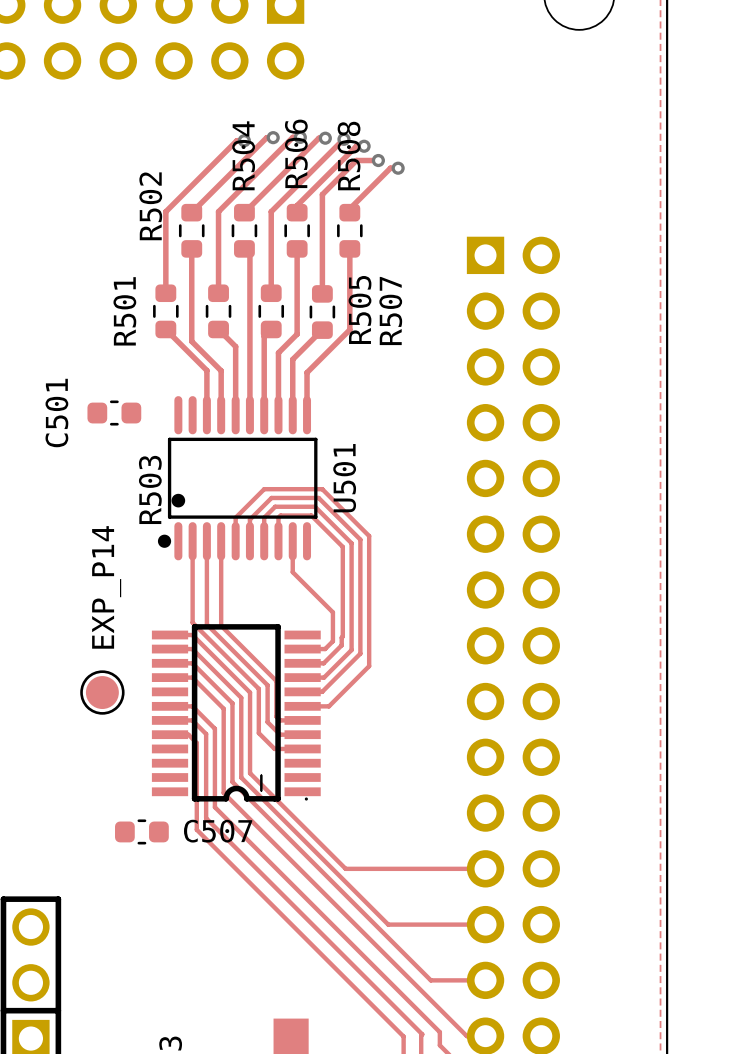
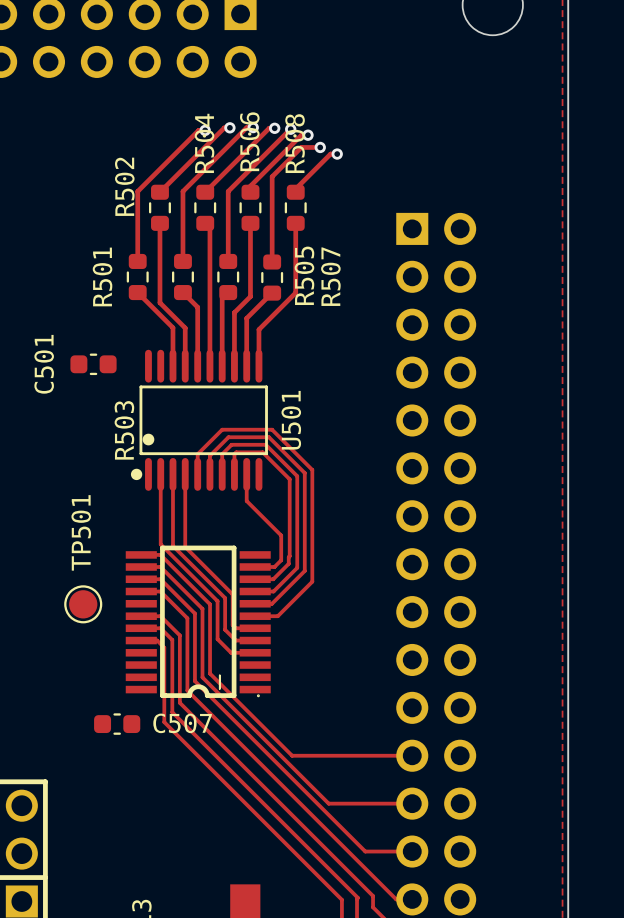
EXP_P14 name: EXP_P14 (106, 587) -> TP501 (81, 532)

